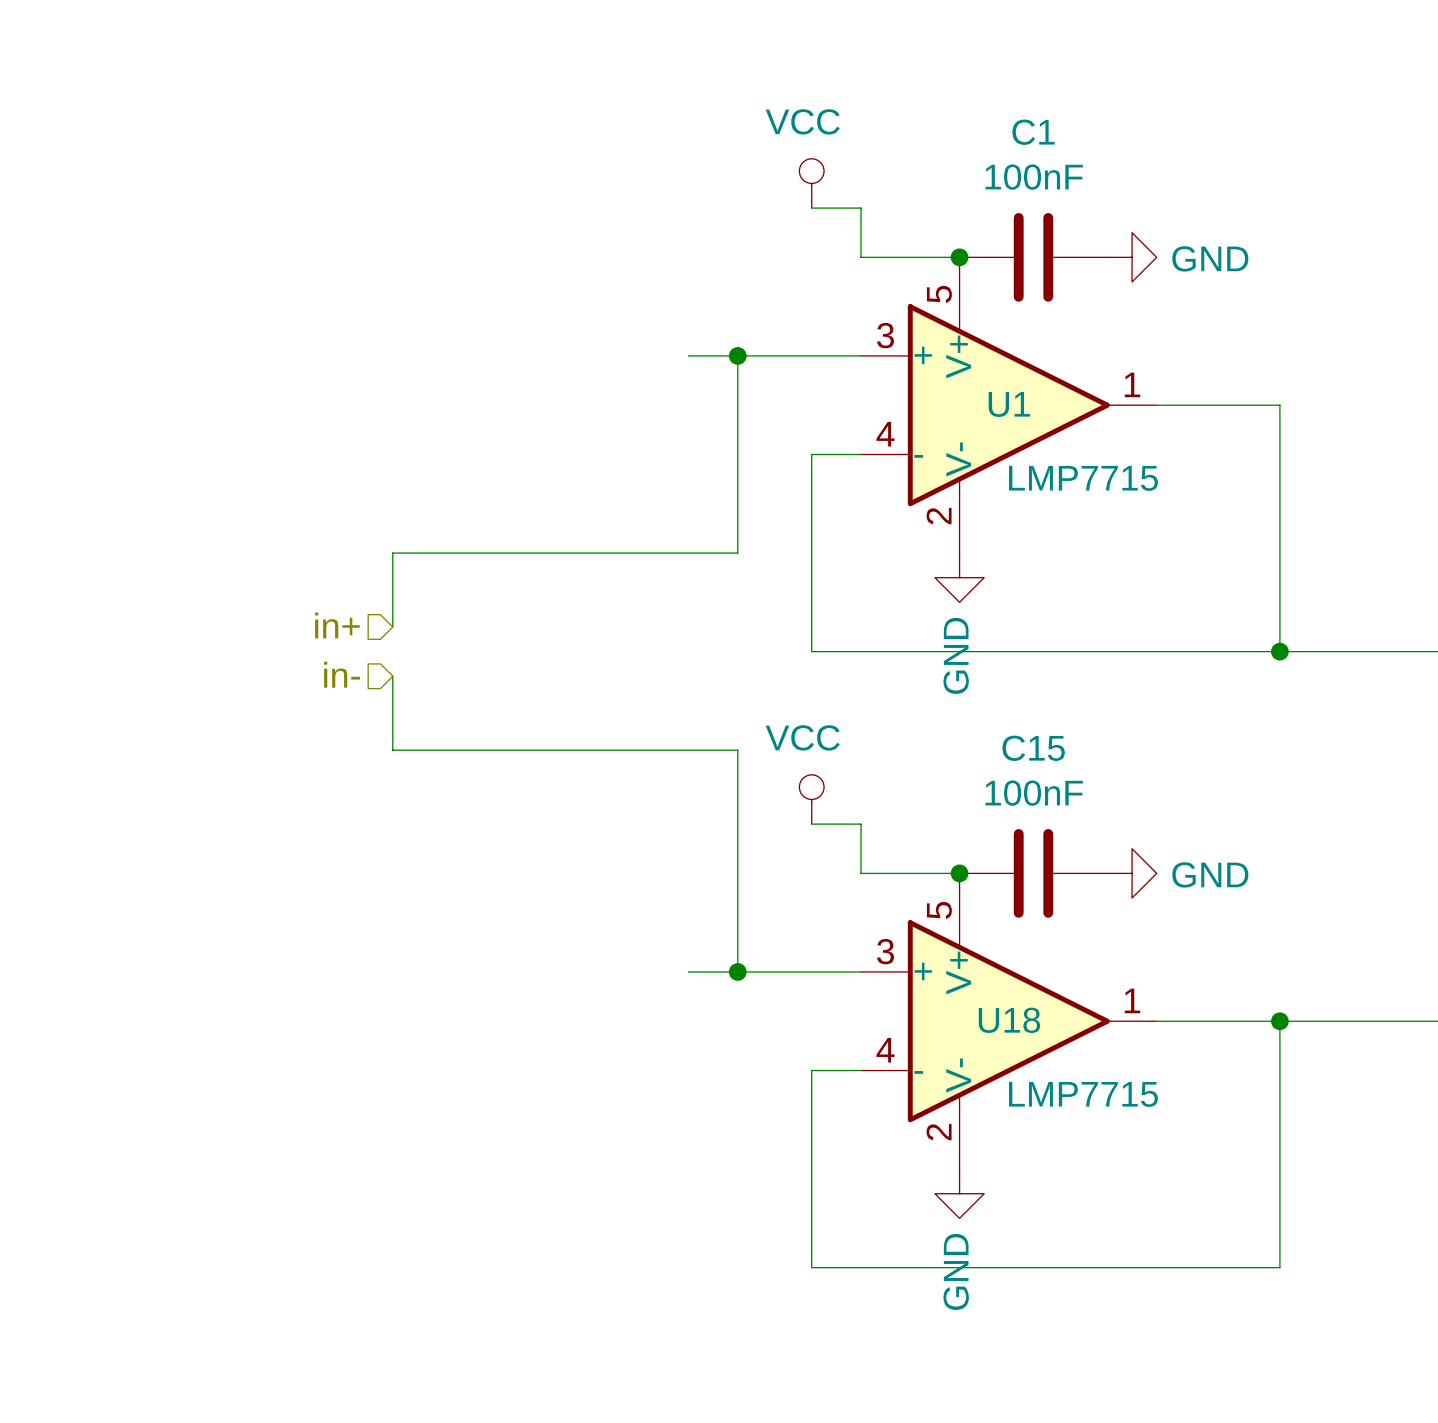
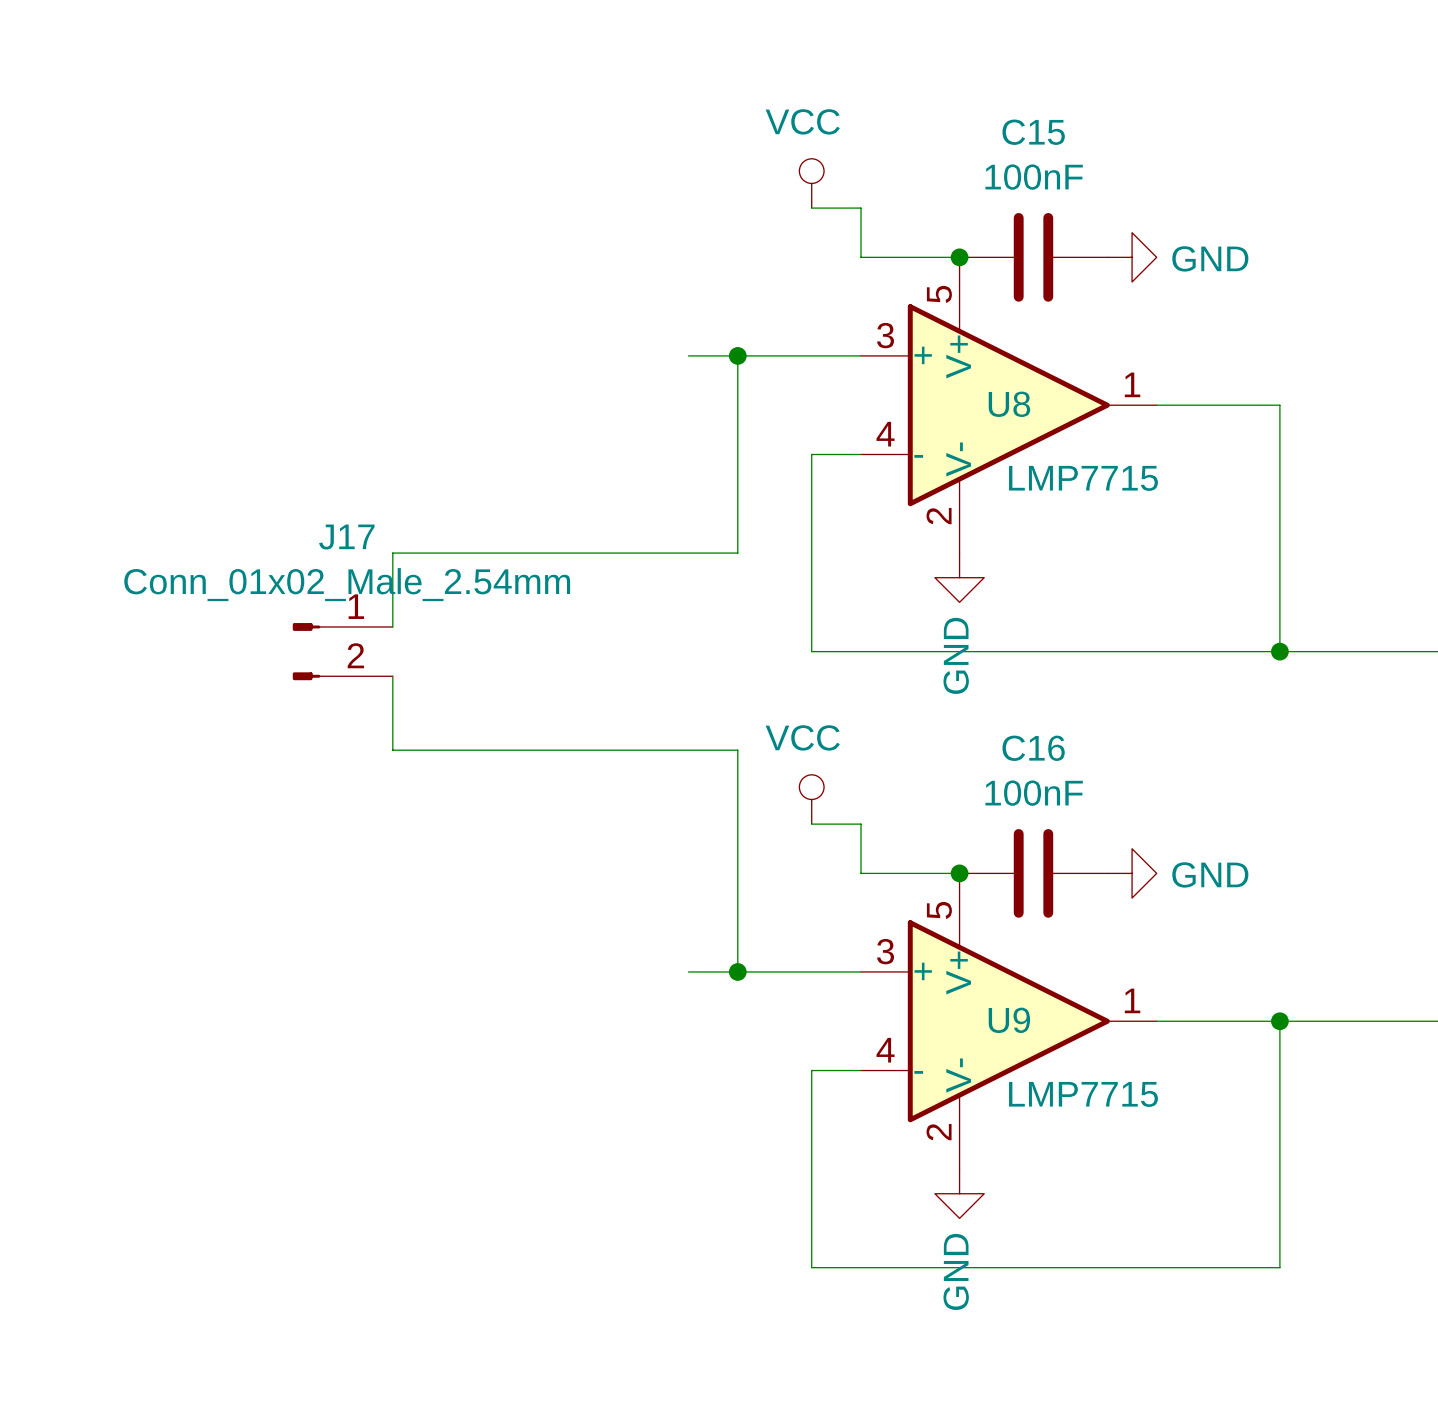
C1 name: C1 (1033, 132) -> C15 (1033, 132)
U1 name: U1 (1009, 404) -> U8 (1009, 404)
hierarchical label: in+ (337, 625) -> none
J17: none -> Conn_01x02_Male_2.54mm (342, 651)
hierarchical label: in- (342, 674) -> none
C15 name: C15 (1033, 748) -> C16 (1033, 748)
U18 name: U18 (1009, 1020) -> U9 (1009, 1020)

